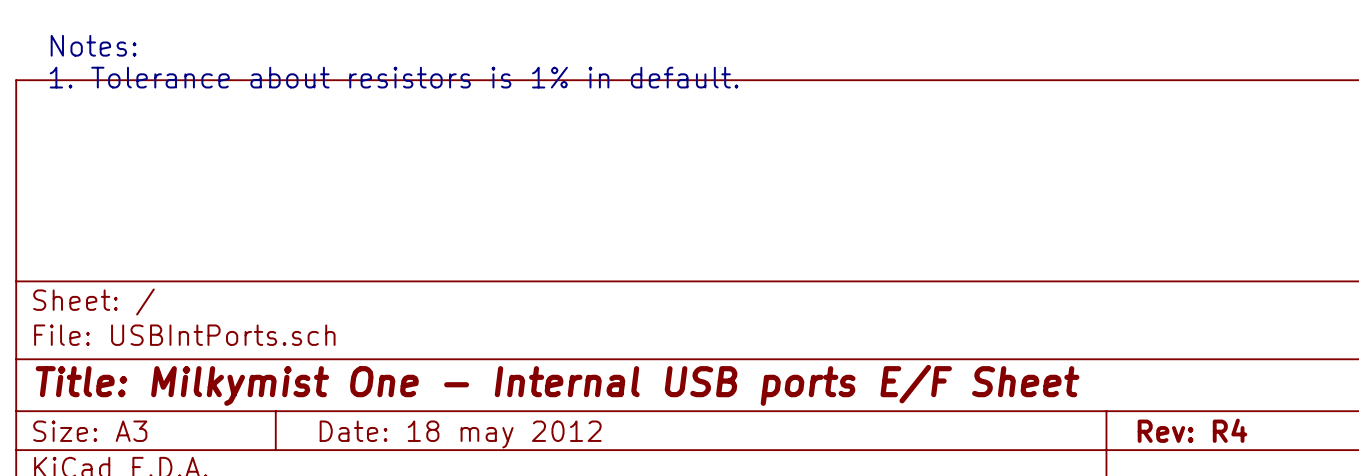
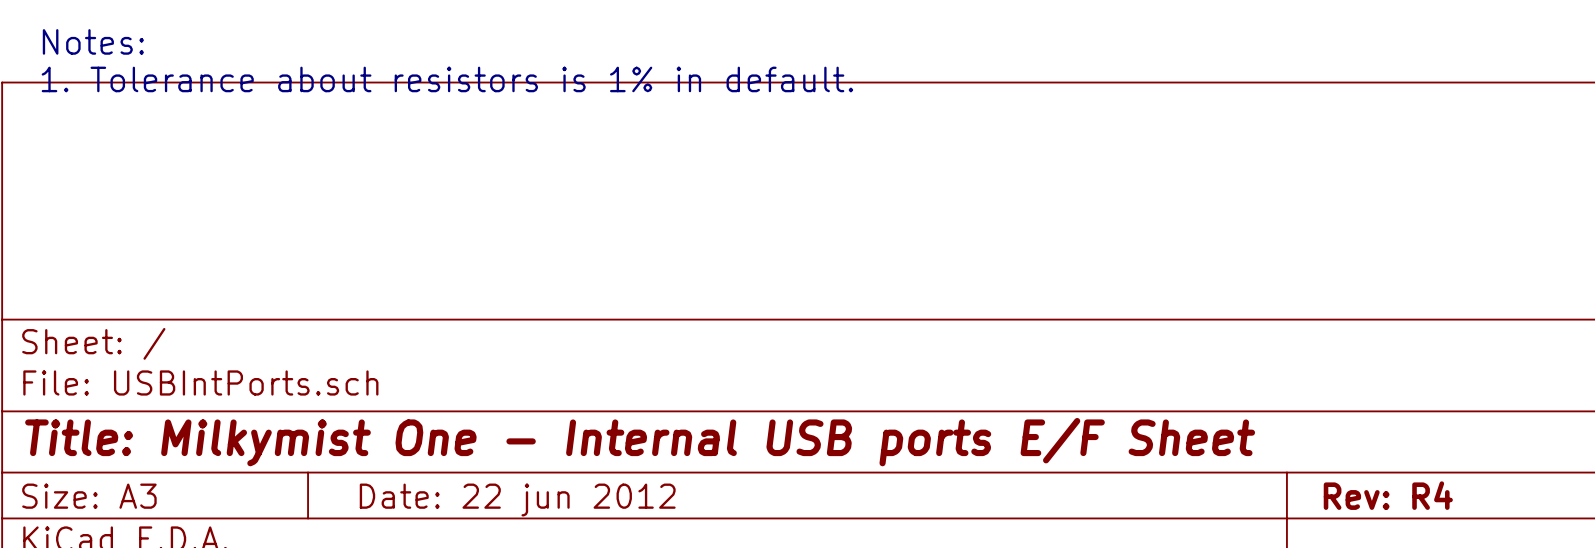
title block: Date: 18 may 2012 (460, 434) -> Date: 22 jun 2012 (517, 499)

